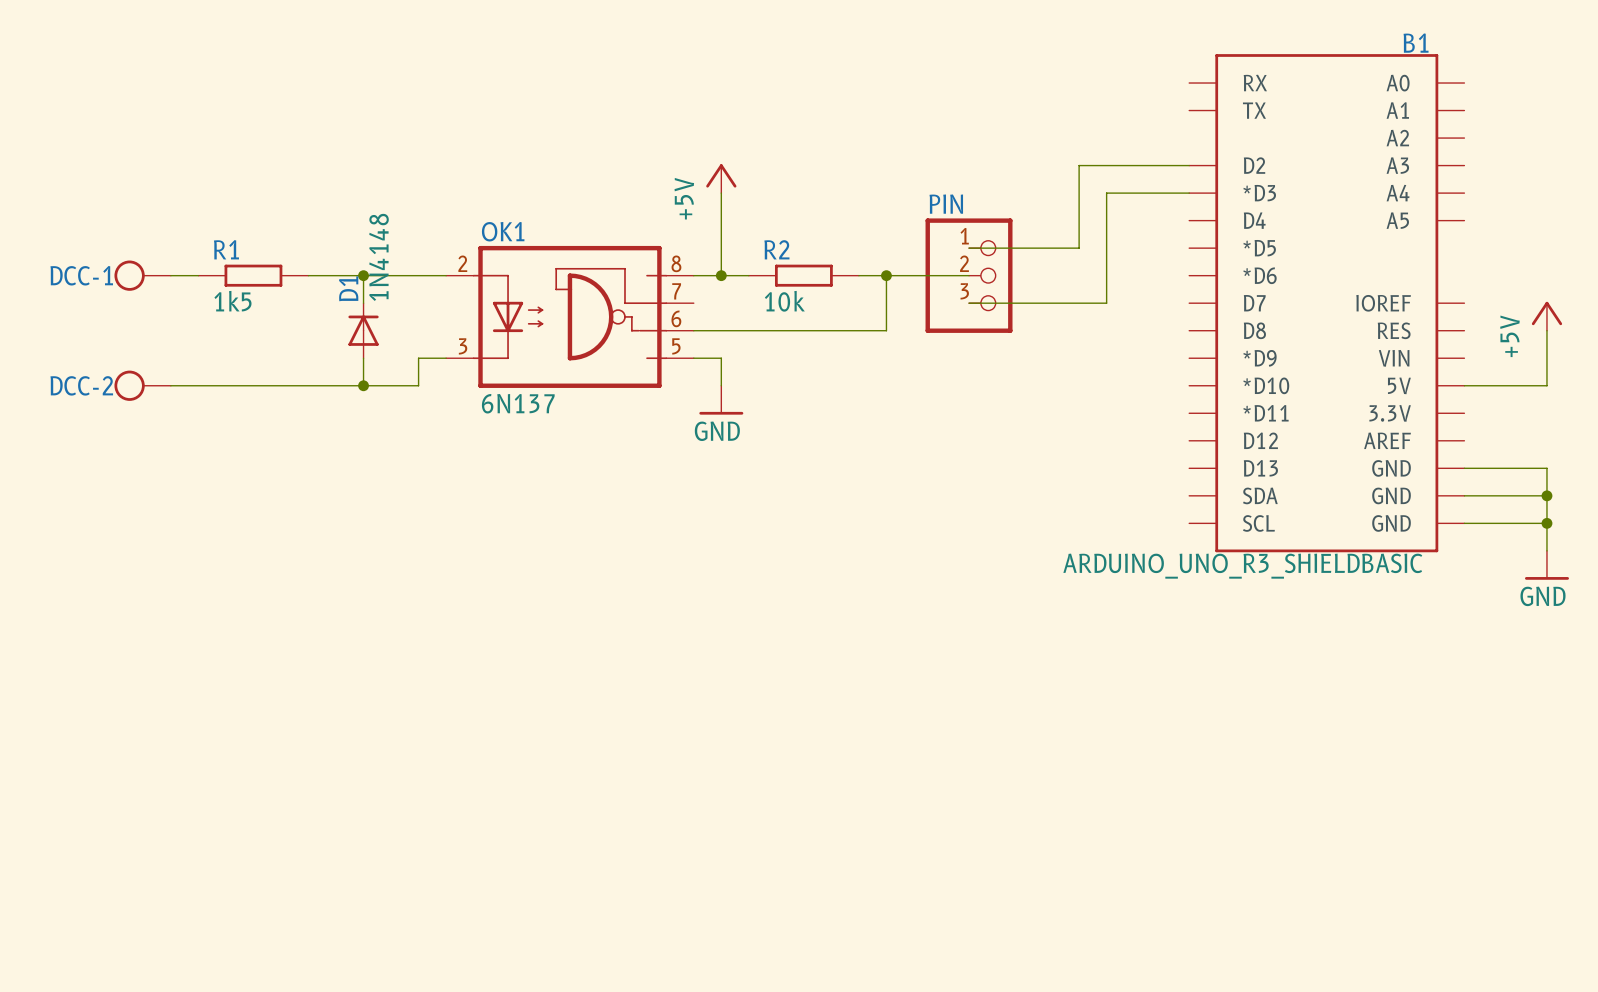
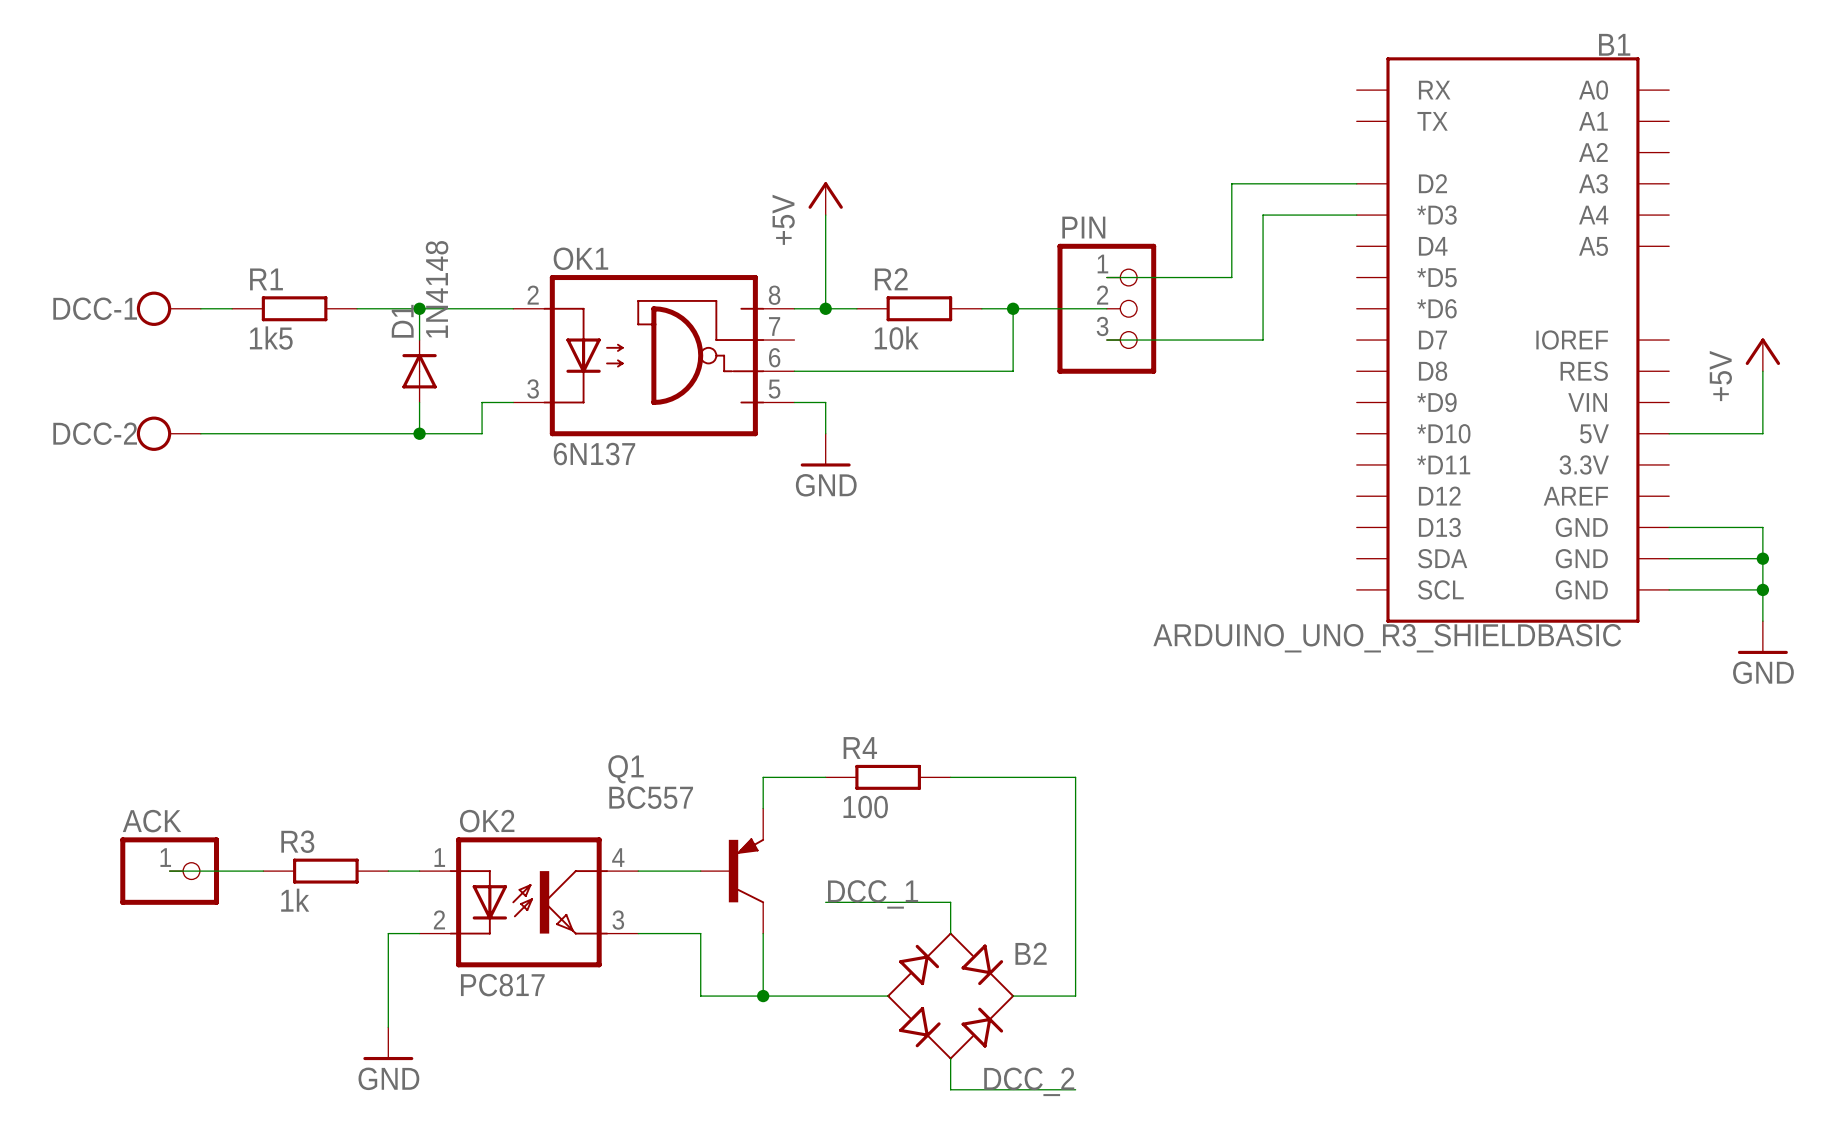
wire: none -> (825, 777) (763, 777) (763, 808)
R4: none -> 100 (888, 777)
wire: none -> (950, 777) (1075, 777) (1075, 996) (1013, 996)
wire: none -> (169, 871) (263, 871)
ACK: none -> (169, 871)
R3: none -> 1k (325, 871)
wire: none -> (388, 871) (419, 871)
wire: none -> (638, 871) (700, 871)
Q1: none -> BC557 (732, 871)
label: none -> DCC_1 (873, 894)
OK2: none -> PC817 (528, 902)
wire: none -> (825, 902) (950, 902) (950, 933)
wire: none -> (419, 933) (388, 933) (388, 1027)
wire: none -> (638, 933) (700, 933) (700, 996) (888, 996)
wire: none -> (763, 933) (763, 996)
junction: none -> (763, 996)
B2: none -> (950, 996)
power symbol: none -> GND (388, 1043)
wire: none -> (950, 1058) (950, 1089) (1075, 1089)
label: none -> DCC_2 (1029, 1081)

